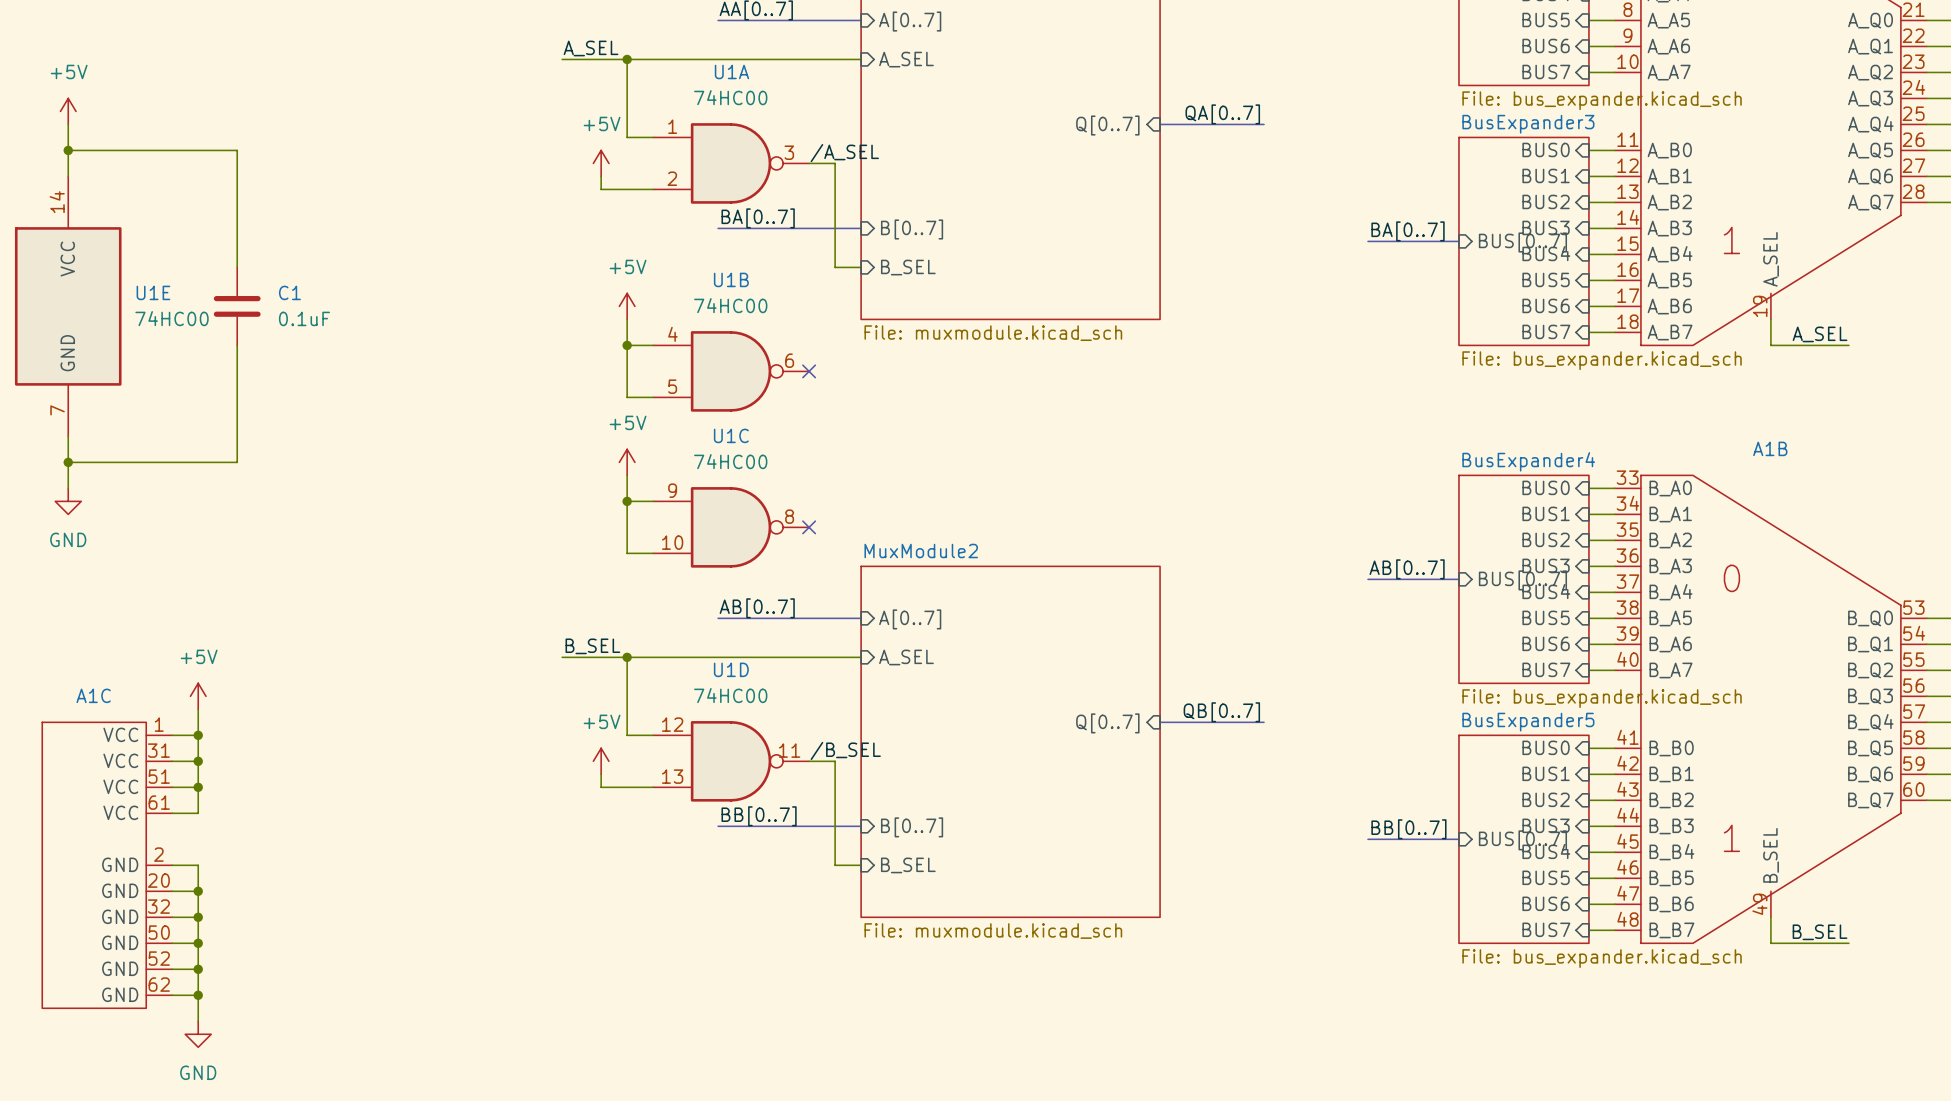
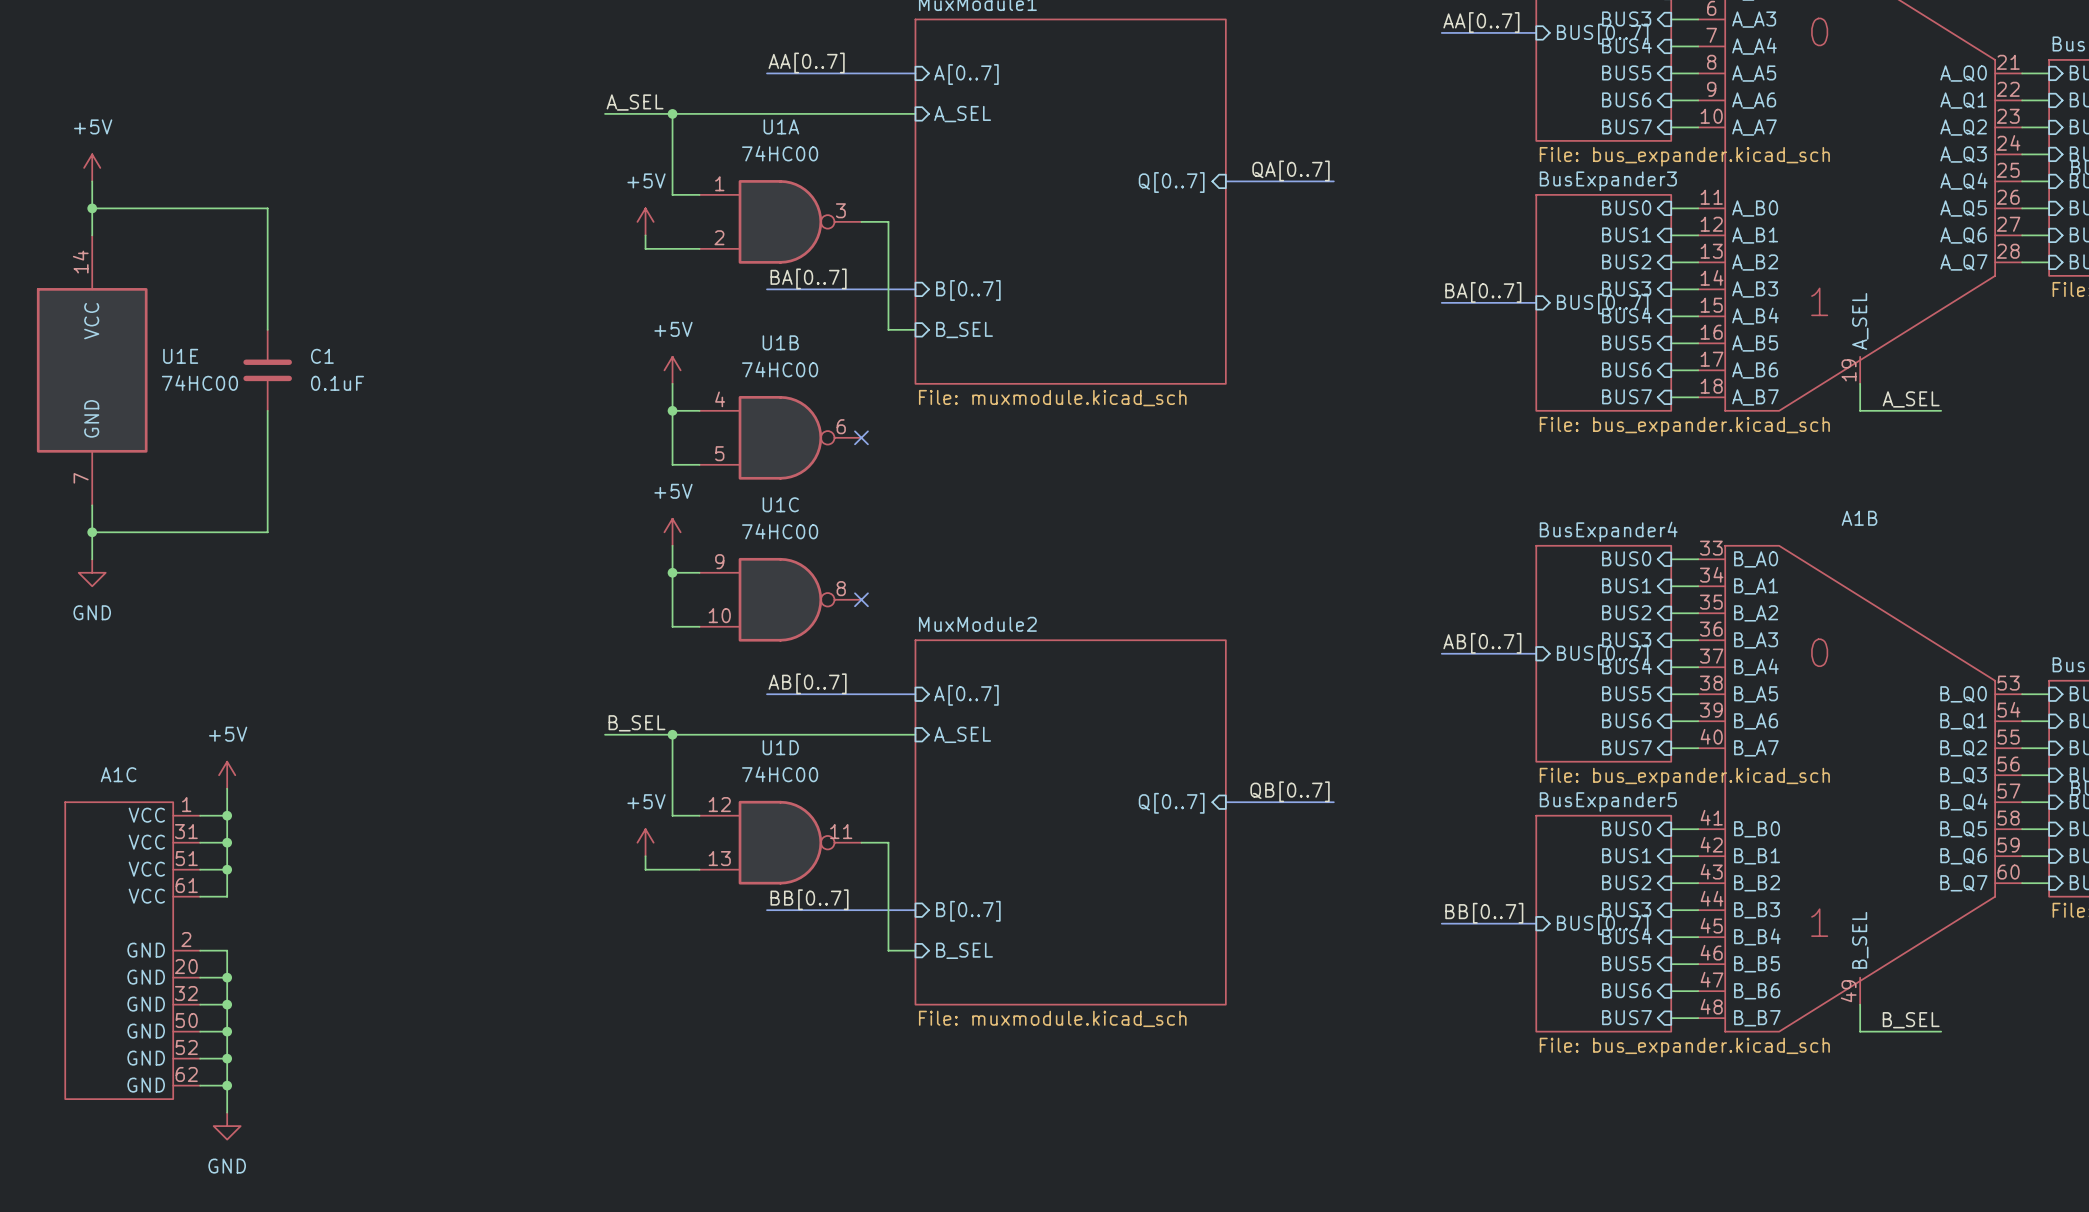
label: /A_SEL (844, 153) -> none
label: /B_SEL (845, 750) -> none

